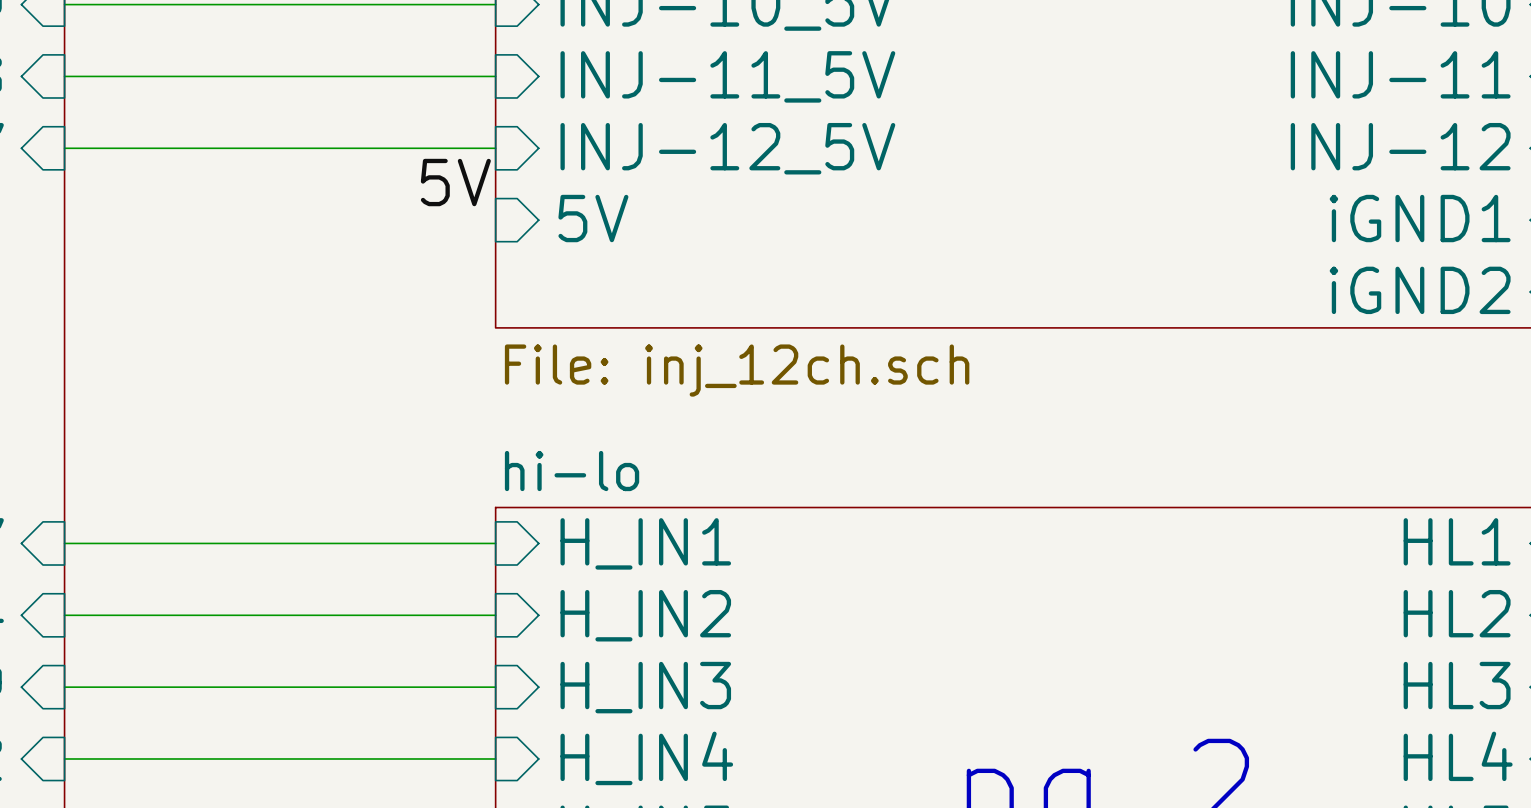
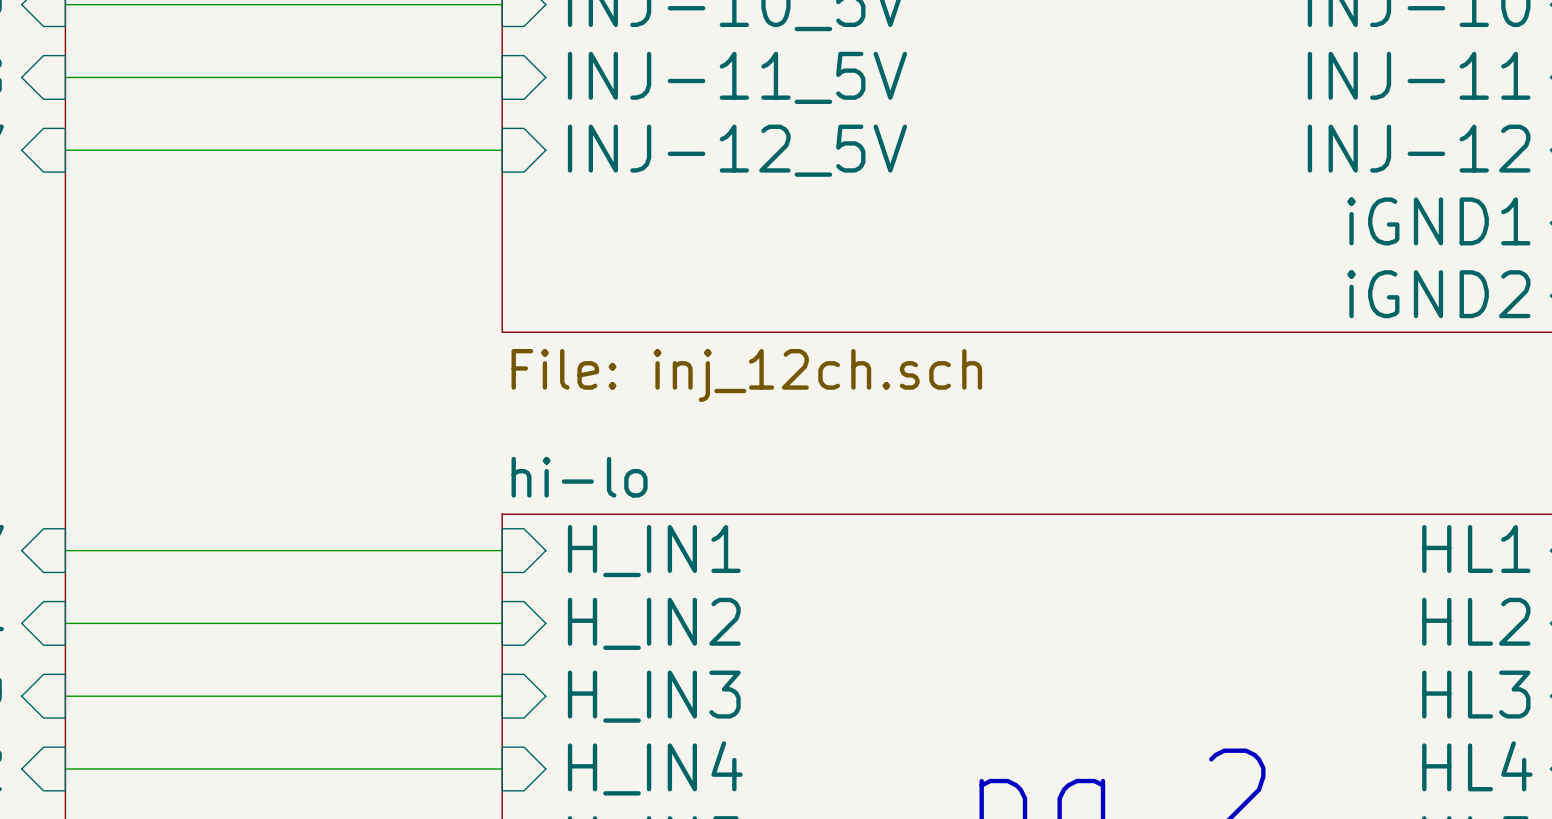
label: 5V (455, 182) -> none
sheet pin: 5V (593, 218) -> none

